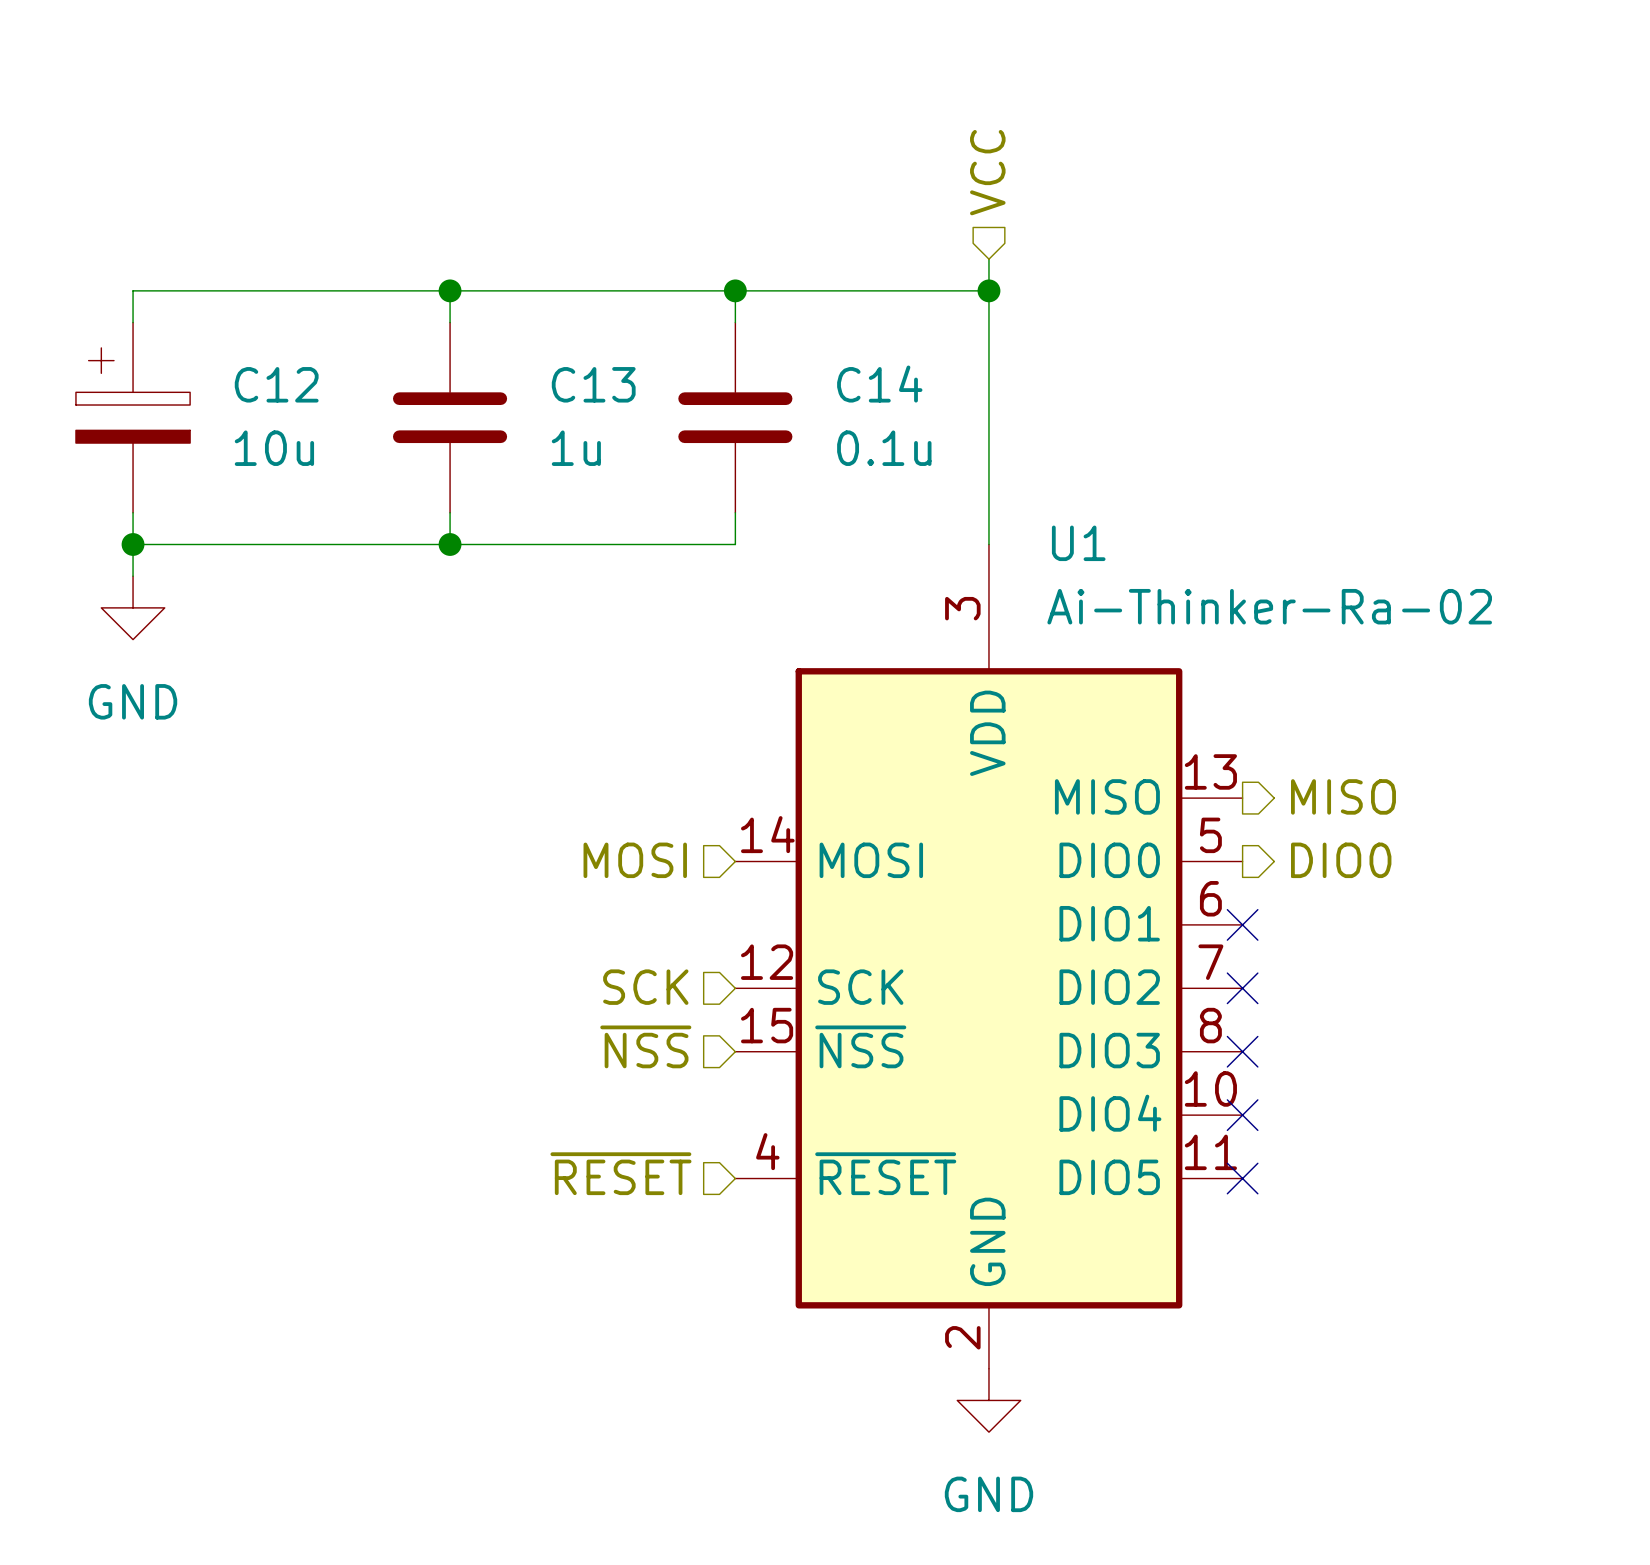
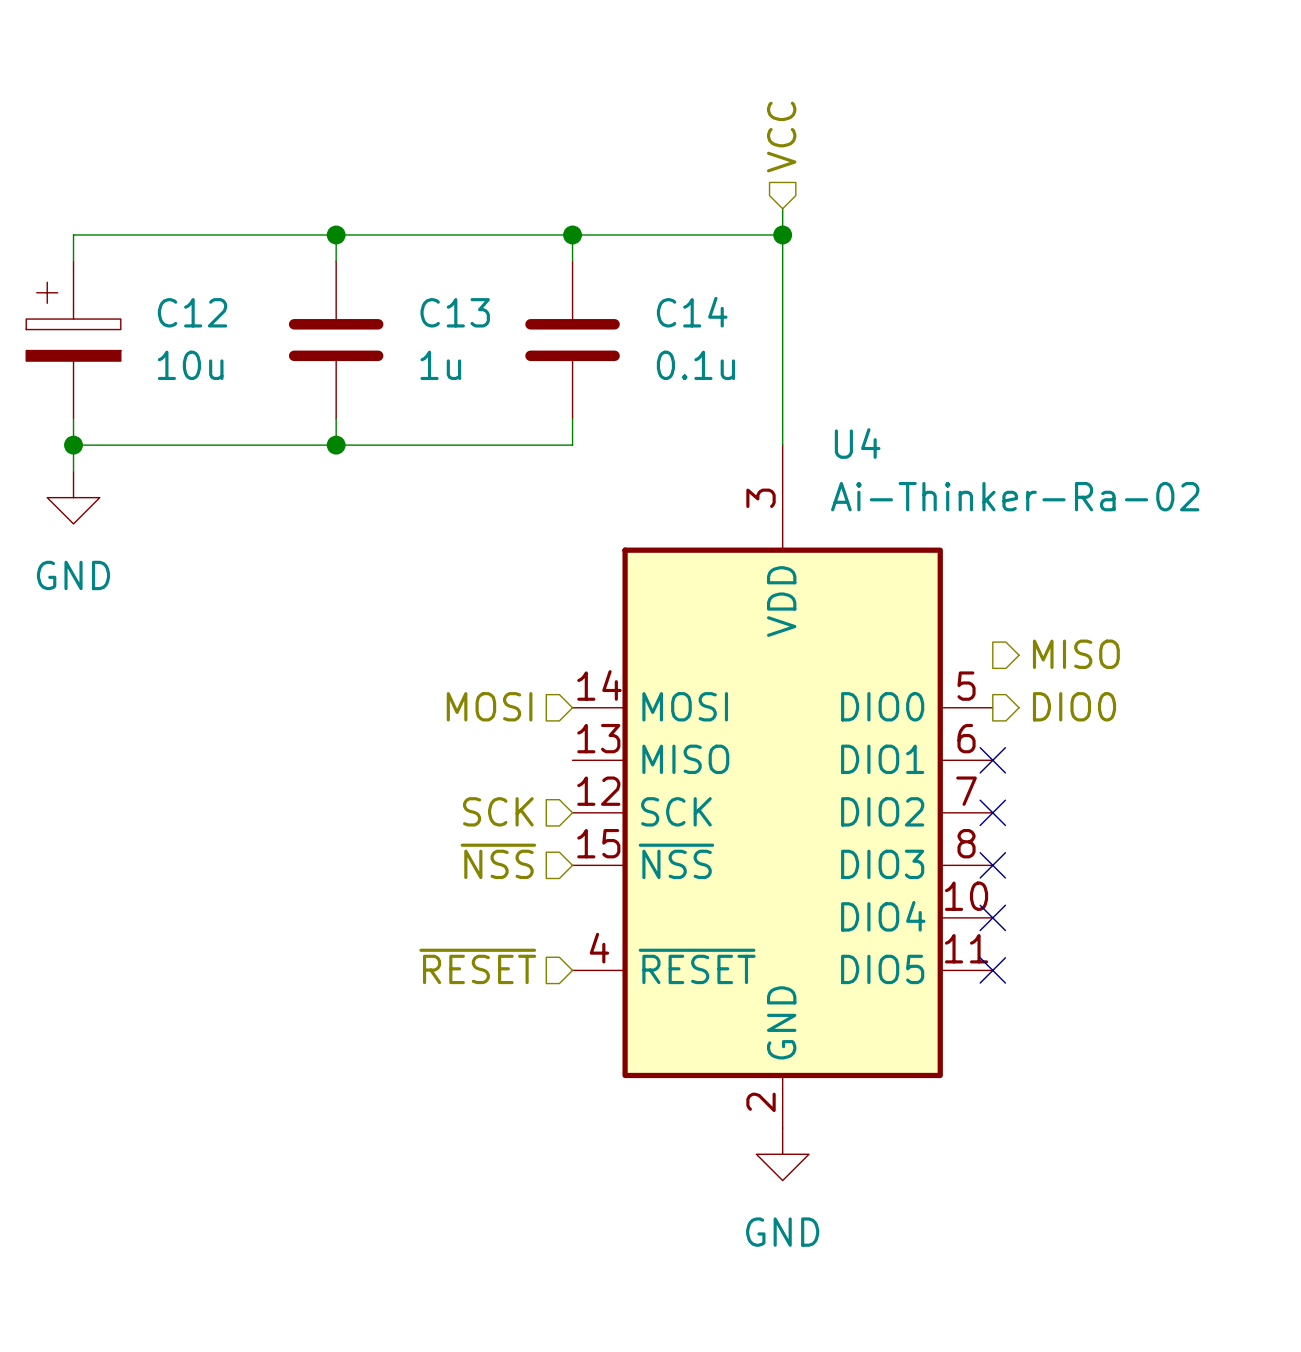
U1: Ai-Thinker-Ra-02 (988, 956) -> none
U4: none -> Ai-Thinker-Ra-02 (782, 786)

